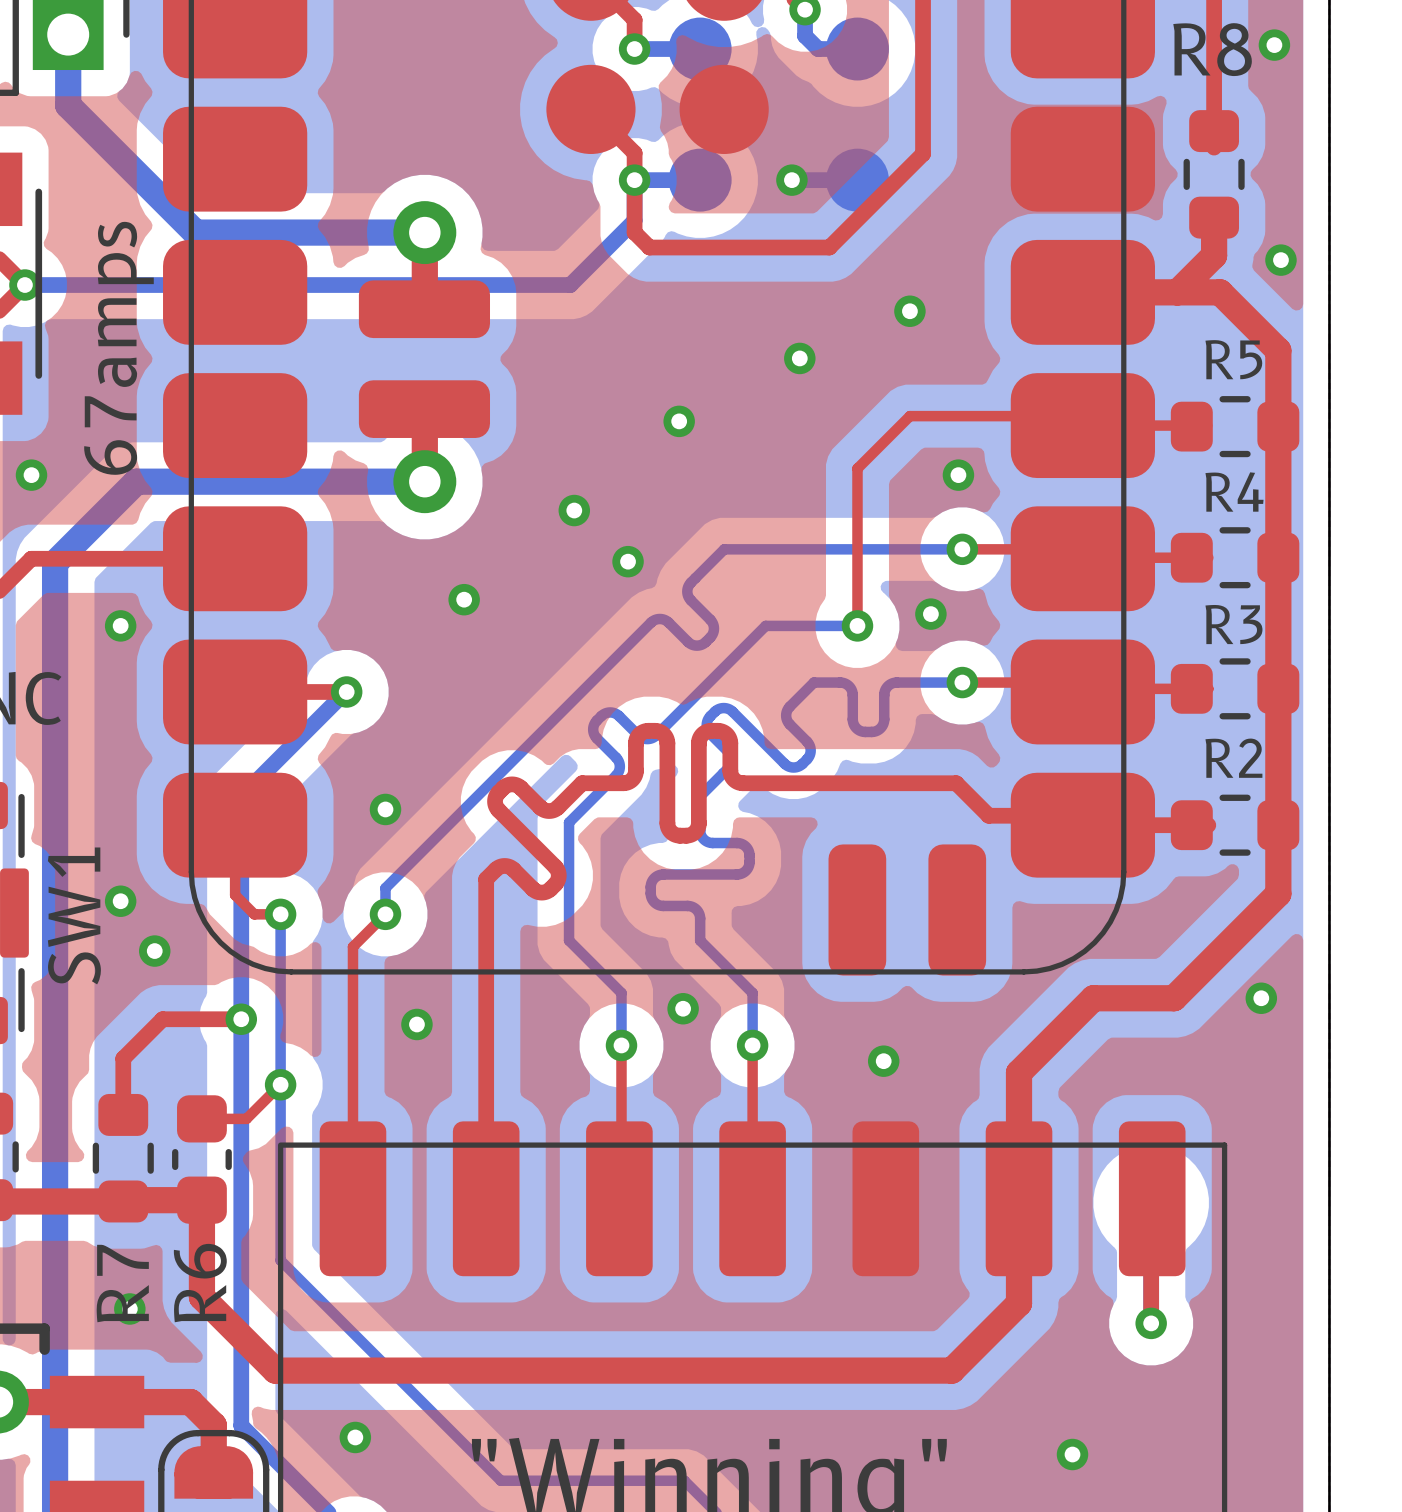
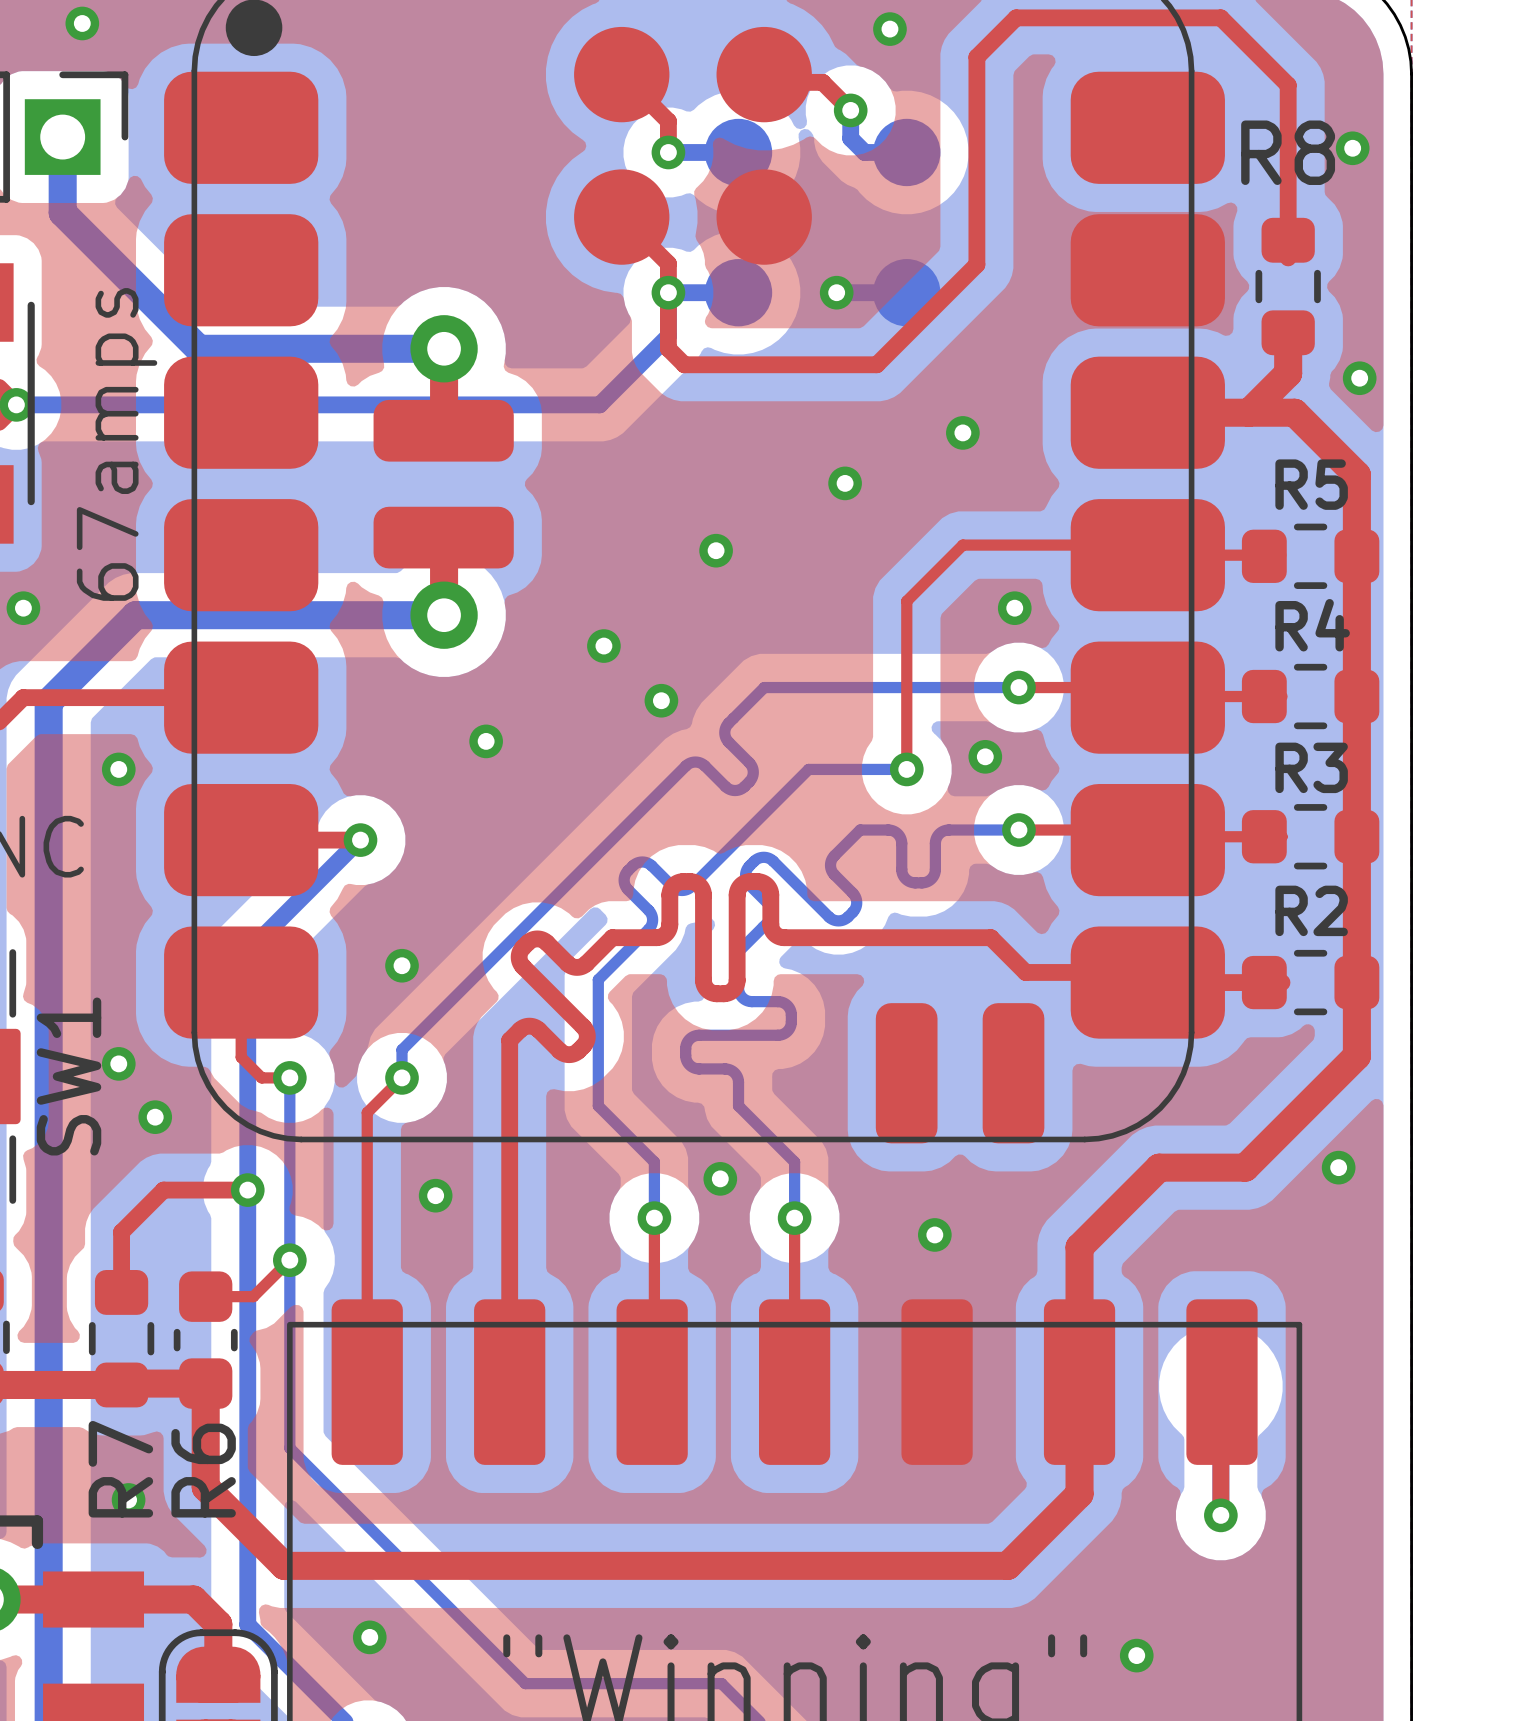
top track: (936, 783) (956, 783) (988, 815) -> (990, 937) (1025, 972) (1047, 972)

